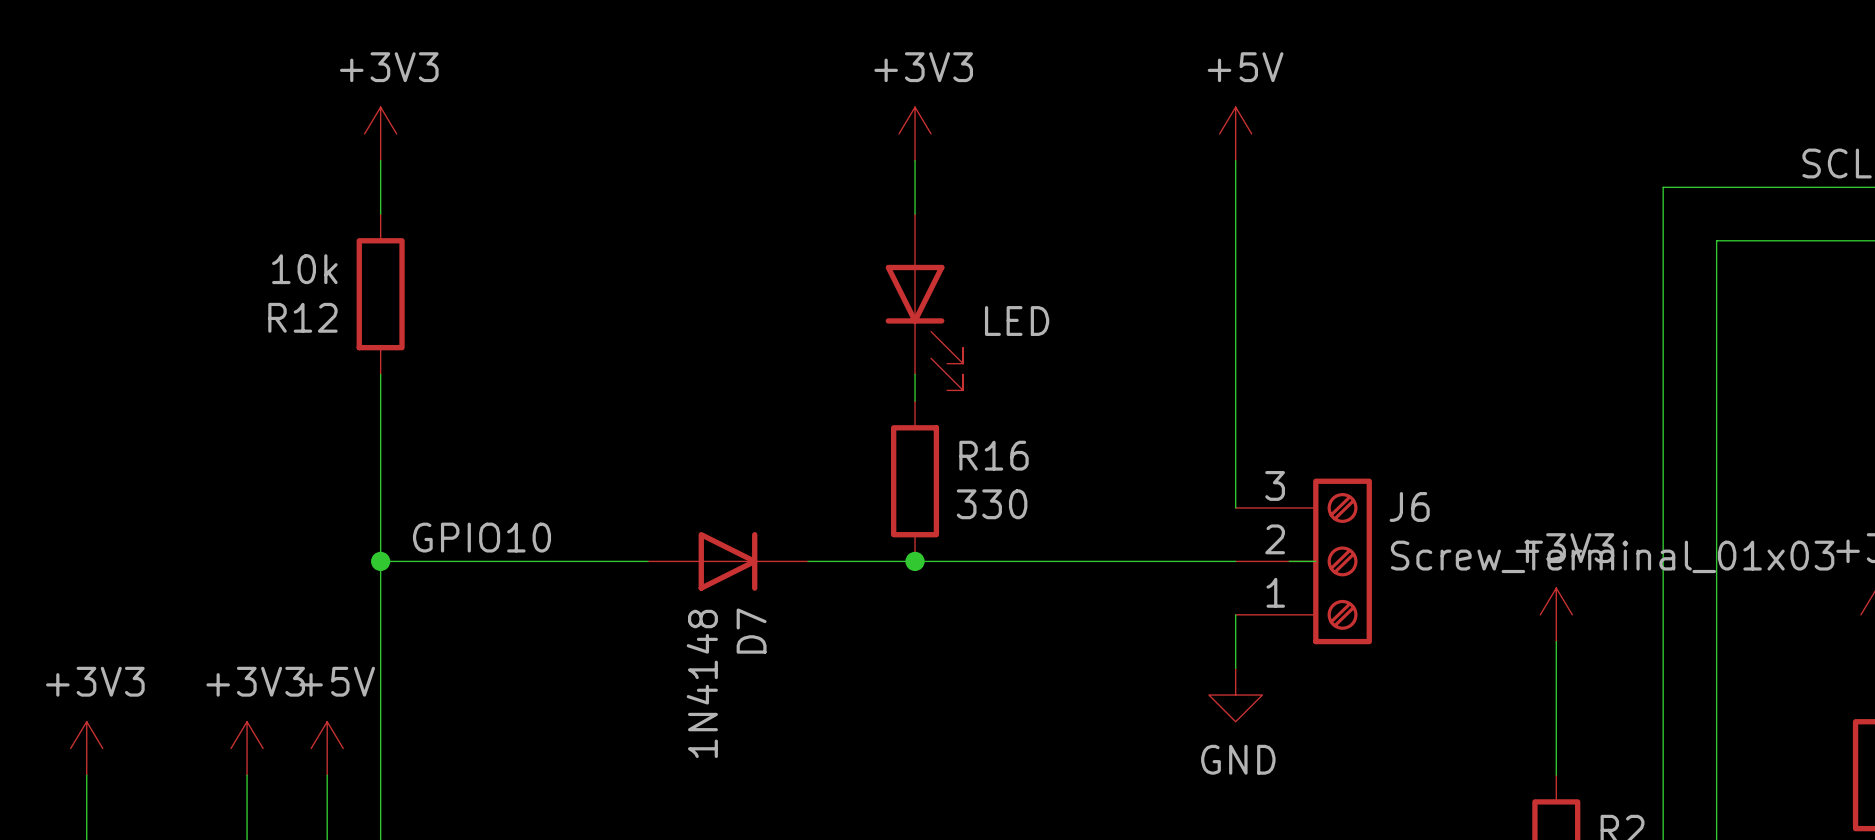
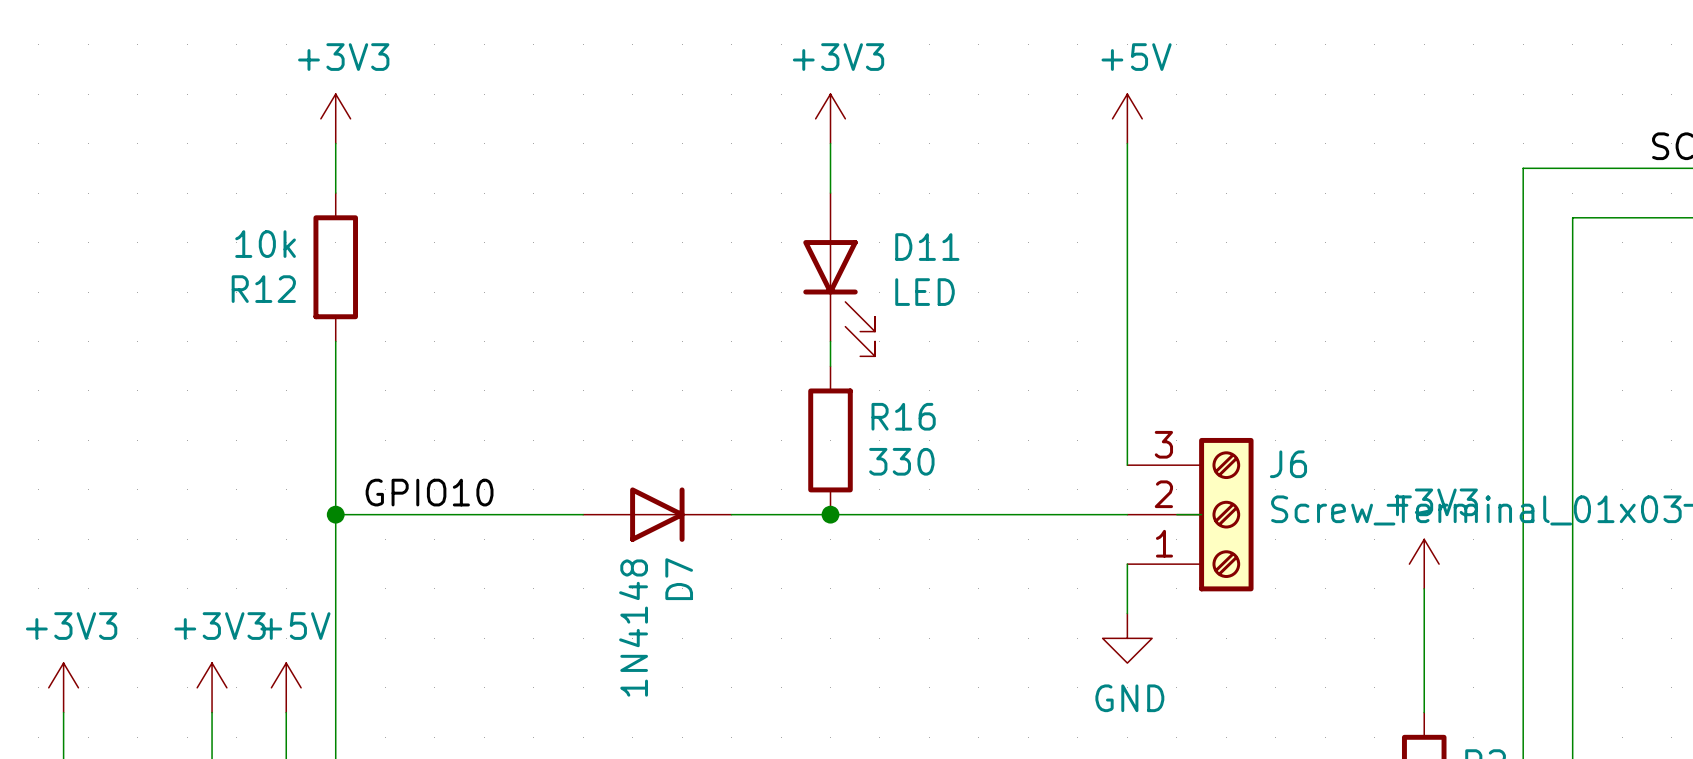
D11 name: none -> D11 (927, 247)

